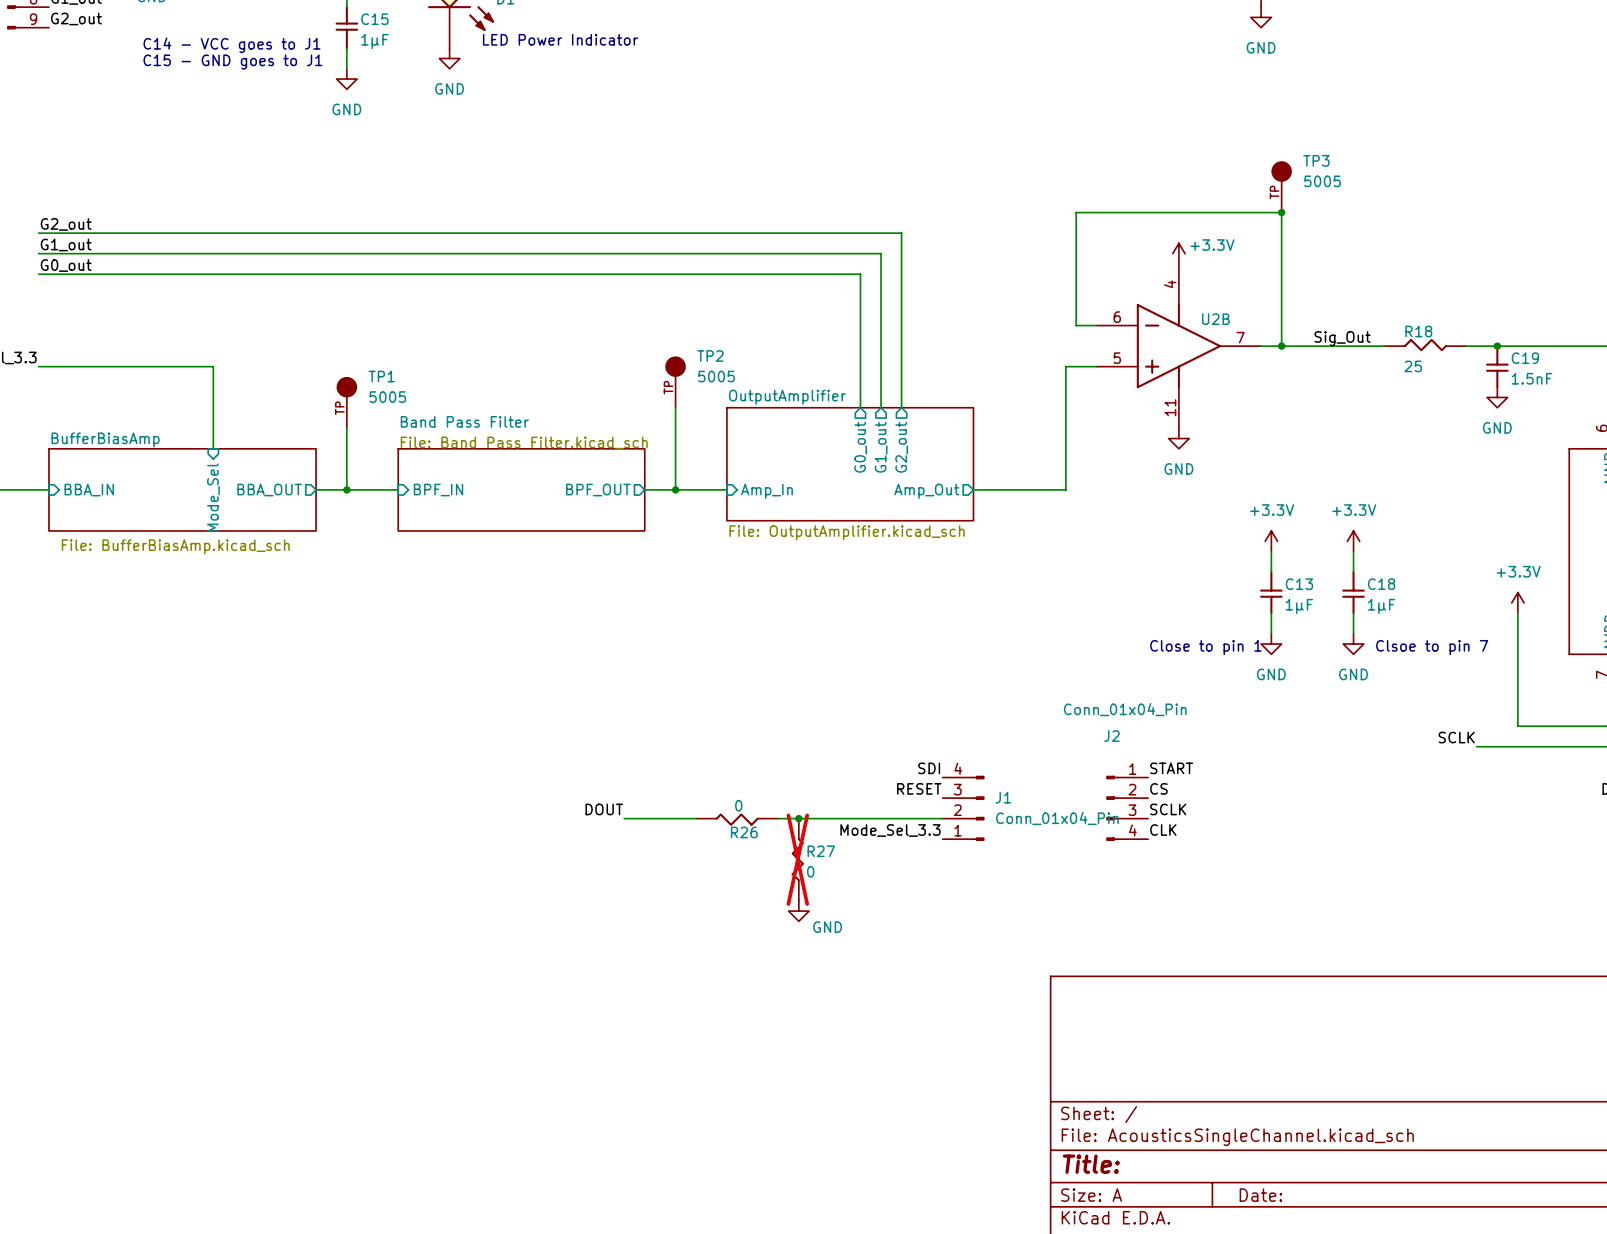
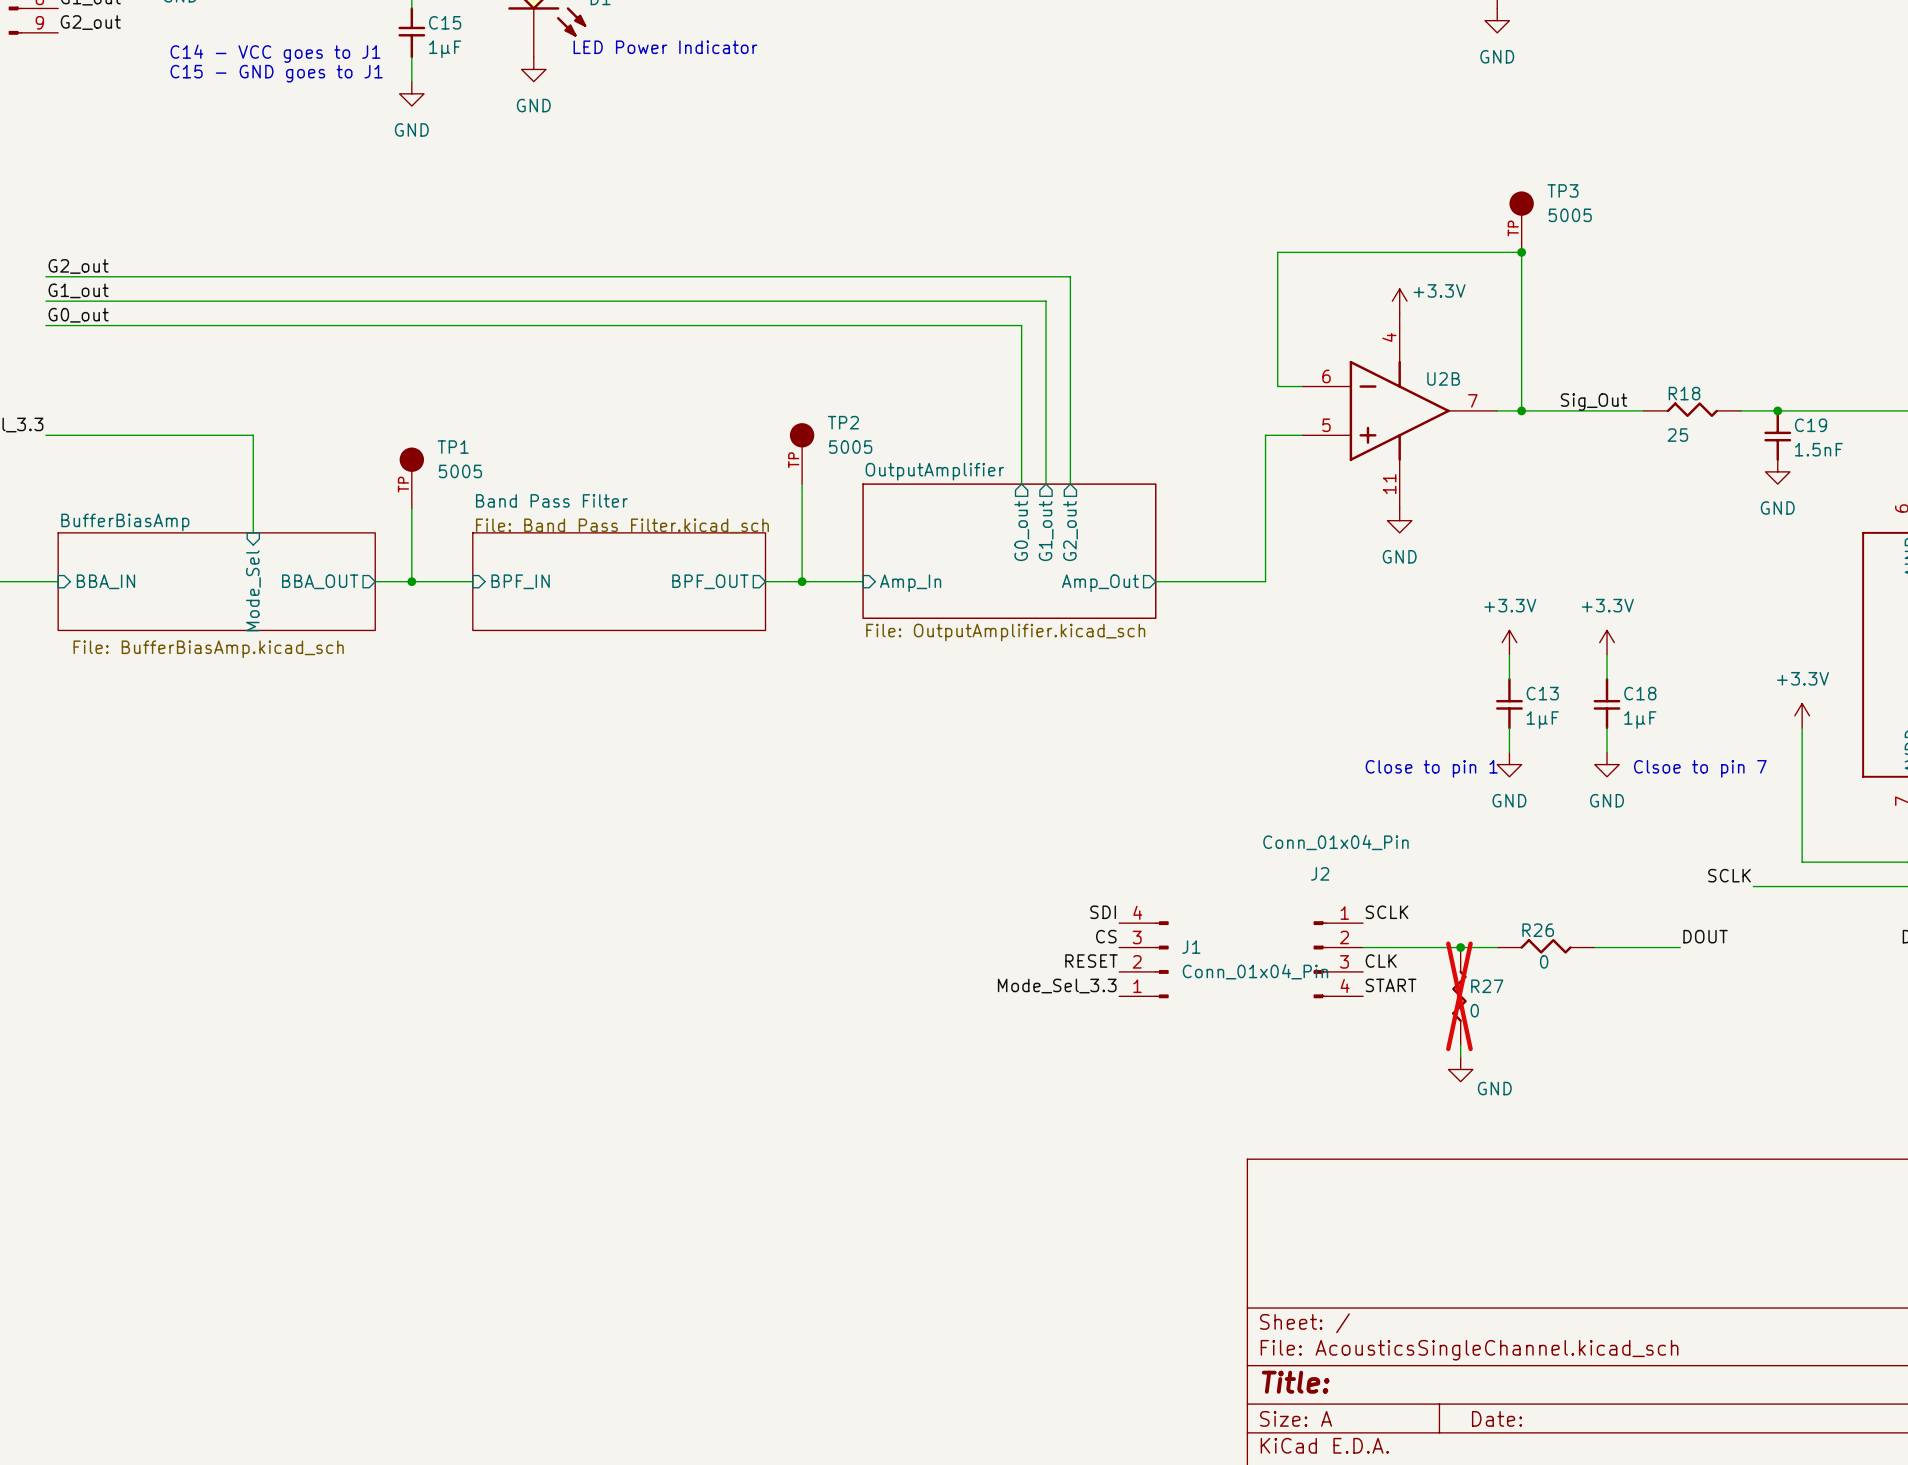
label: START (1171, 768) -> SCLK (1387, 912)
label: RESET (919, 788) -> CS (1106, 936)
label: CS (1158, 788) -> none
label: none -> DOUT (1705, 936)
wire: none -> (1363, 947) (1497, 947)
junction: none -> (1460, 947)
wire: none -> (1594, 947) (1680, 947)
label: DOUT (604, 809) -> none
label: none -> RESET (1091, 961)
label: SCLK (1168, 809) -> CLK (1381, 961)
wire: (624, 818) (696, 818) -> none
wire: (778, 818) (942, 818) -> none
junction: (798, 818) -> none
R26 rotation: 0° (737, 819) -> 180° (1546, 946)
R26 position: (737, 819) -> (1546, 946)
label: CLK (1163, 830) -> START (1391, 985)
R27 position: (797, 859) -> (1459, 996)
wire: none -> (1460, 1045) (1460, 1057)
power symbol: none -> GND (1460, 1069)
power symbol: GND (798, 911) -> none

